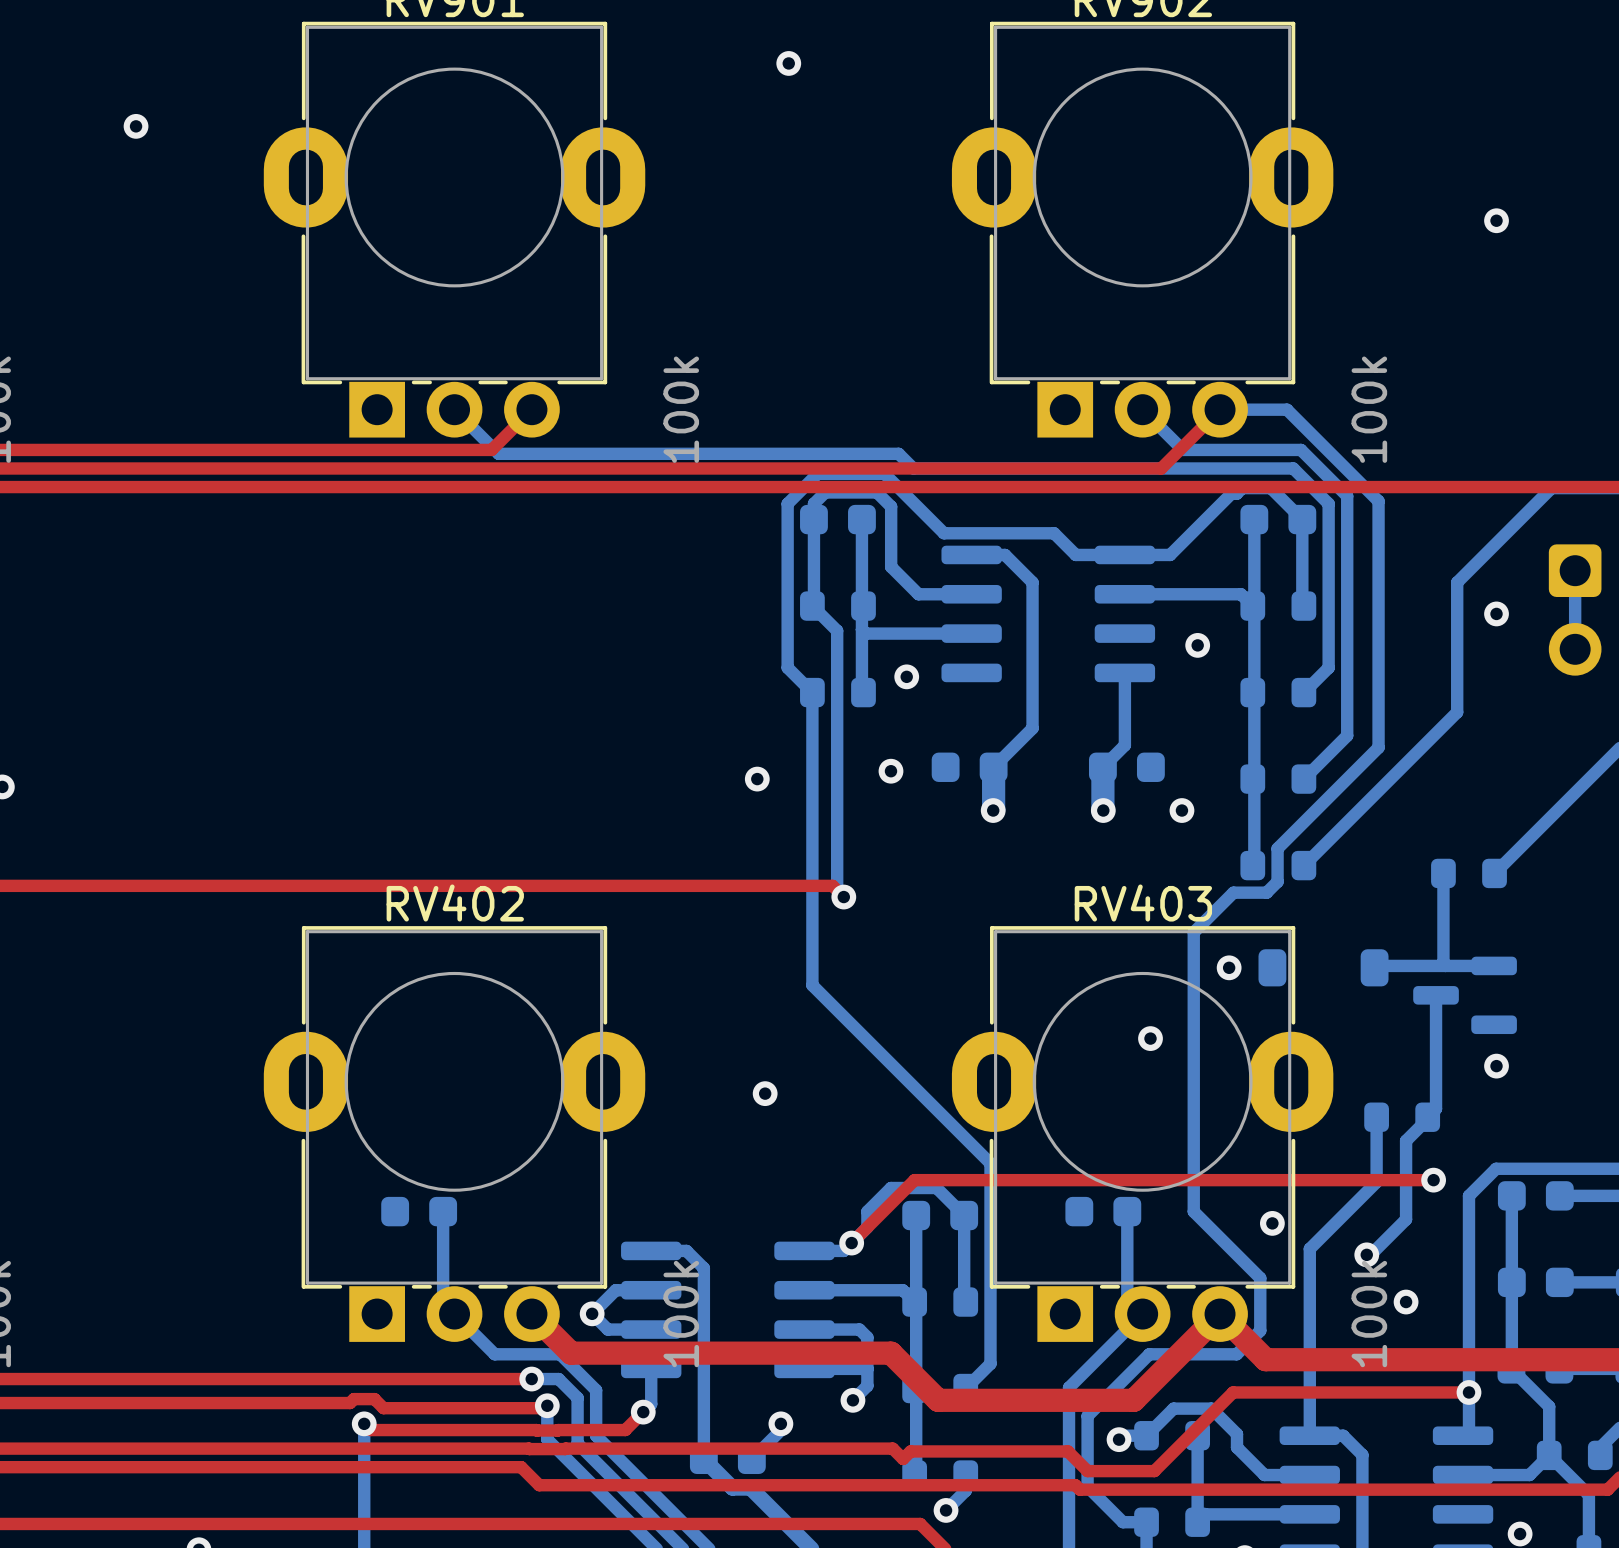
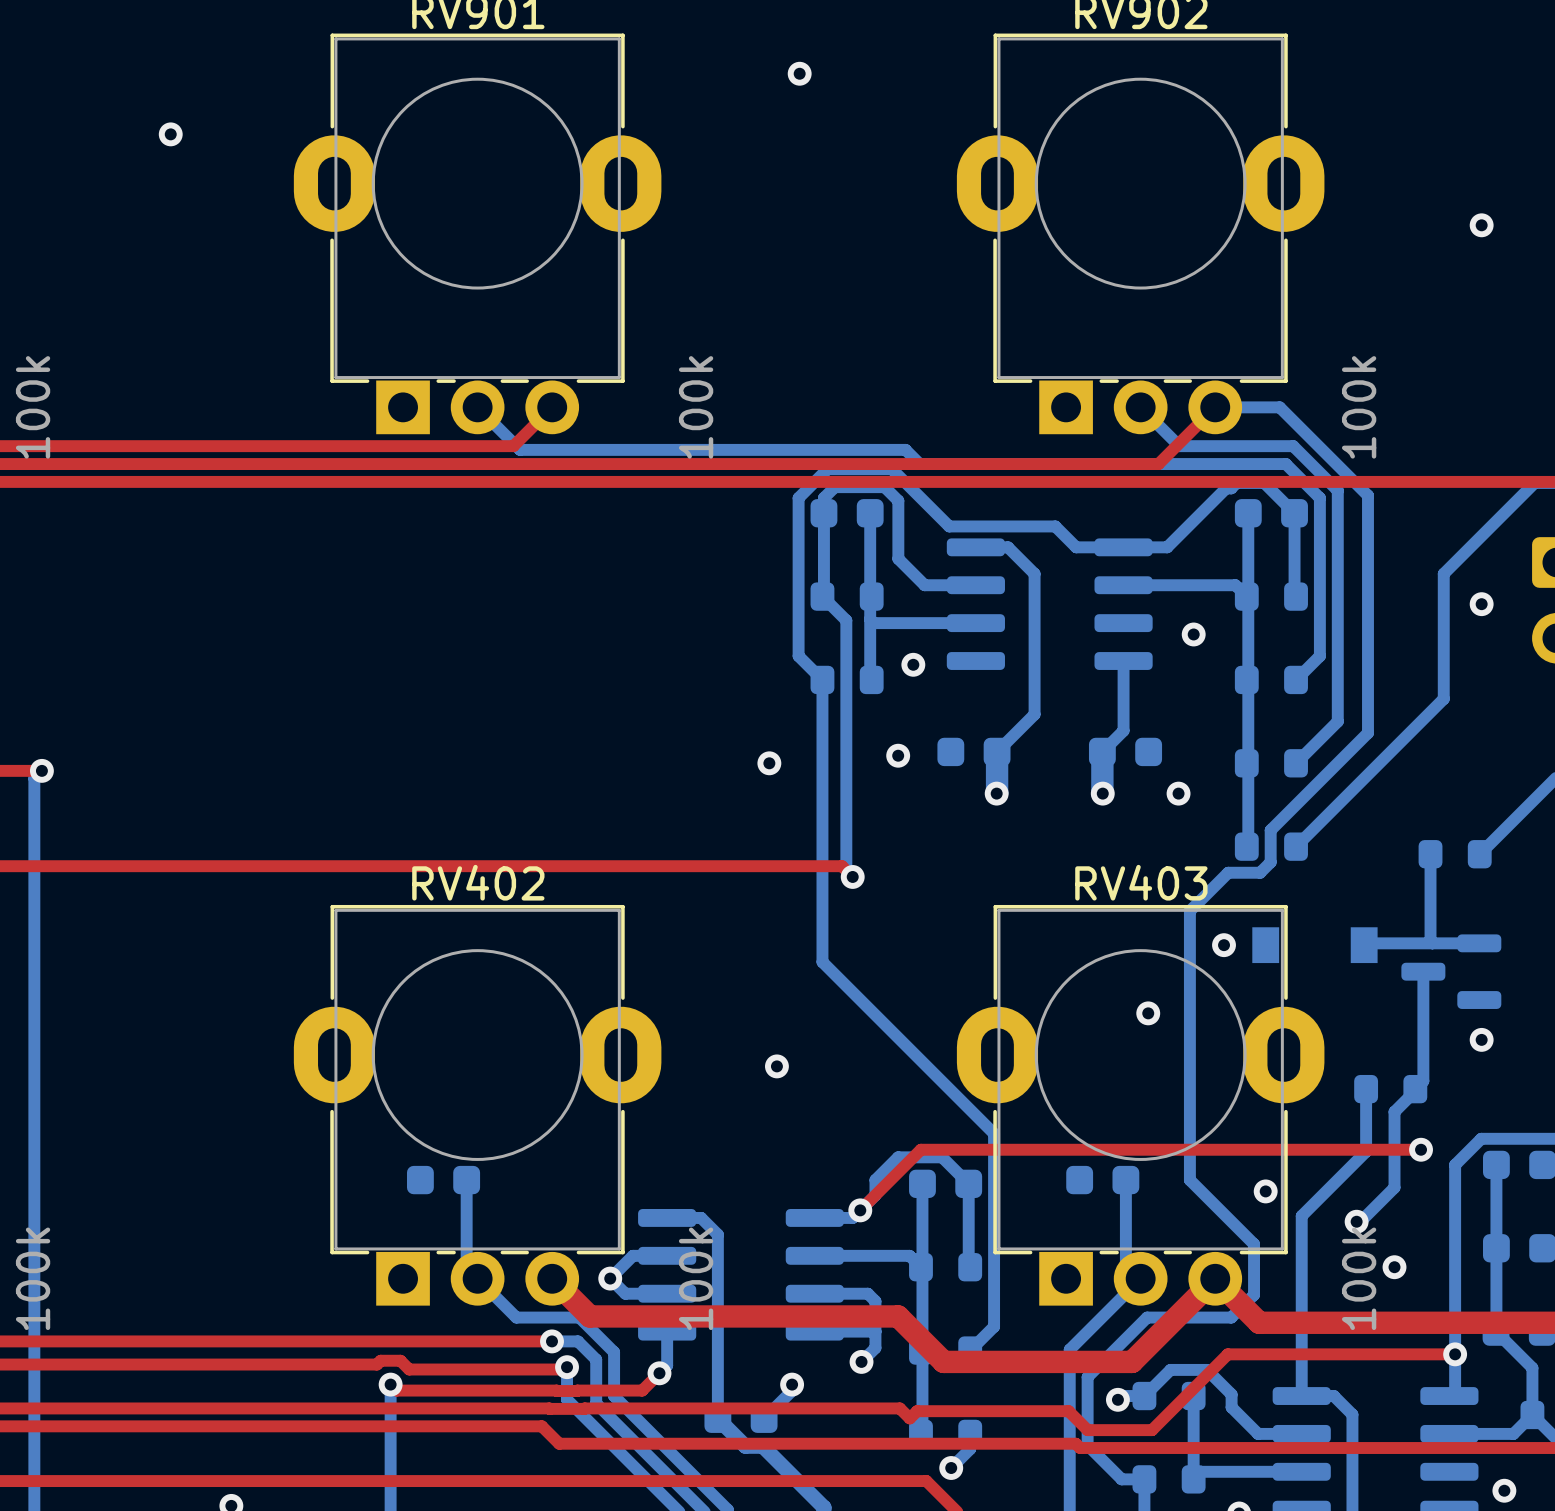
part footprint: [1258, 949, 1389, 987] -> [1252, 927, 1378, 964]

